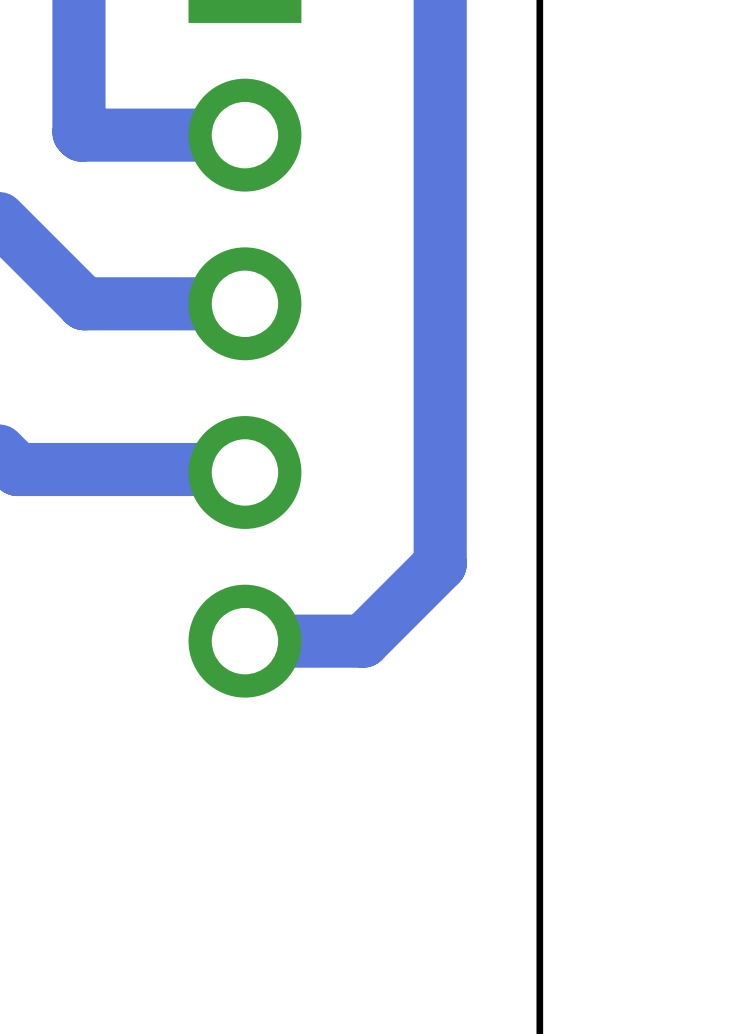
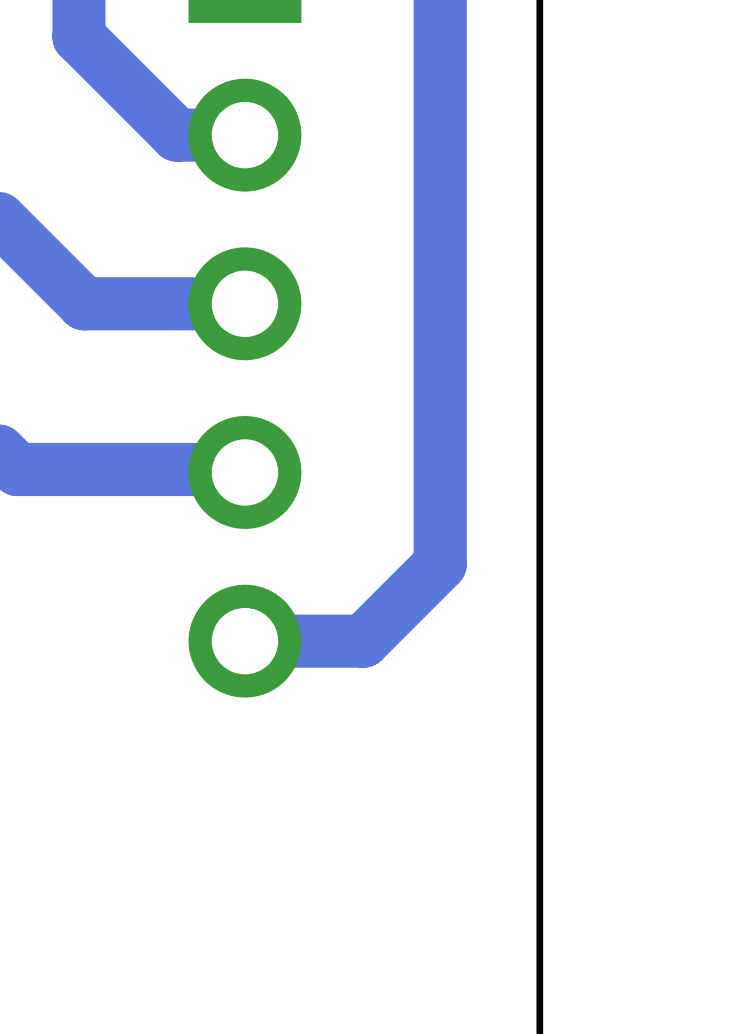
track: (78, 36) (78, 132) (81, 135) (177, 135) -> (78, 36) (177, 135)

